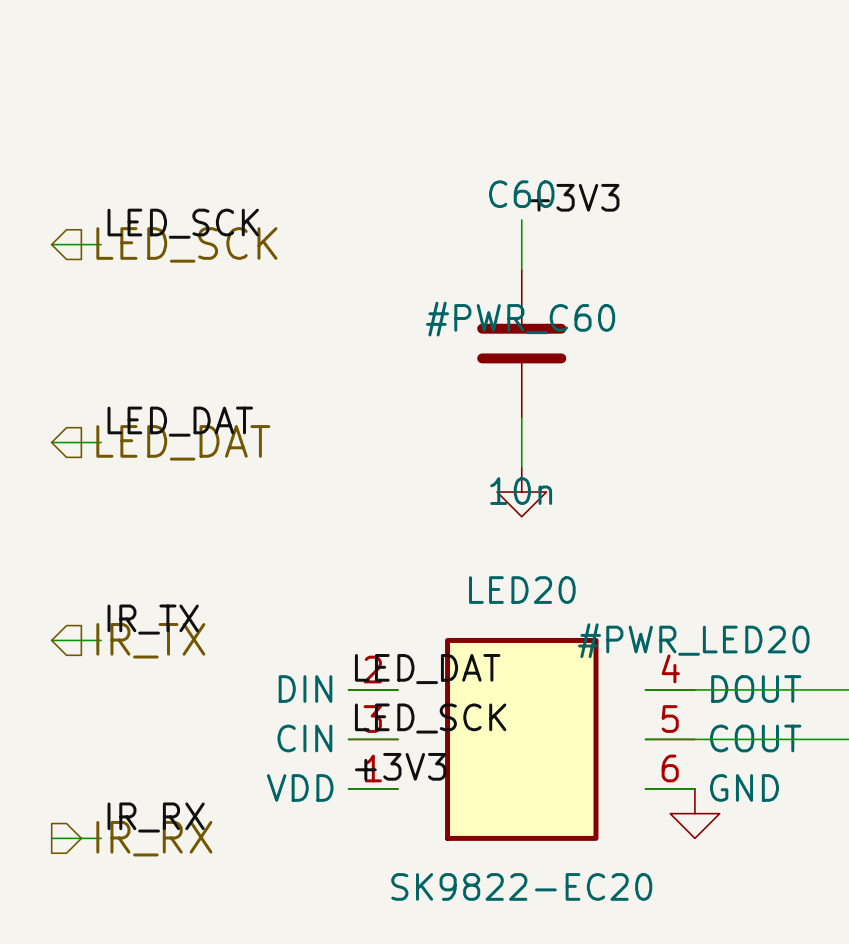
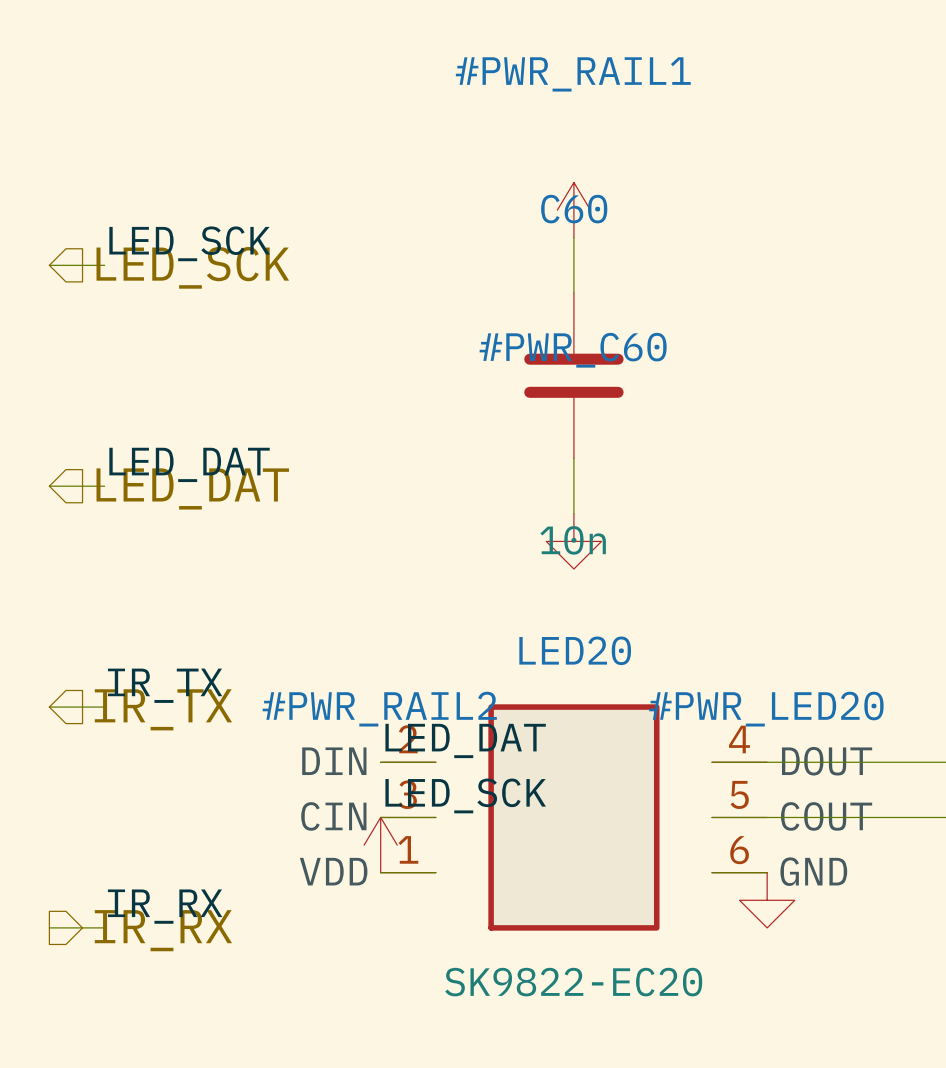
#PWR_RAIL1: none -> (573, 210)
label: +3V3 (573, 197) -> none
#PWR_RAIL2: none -> (380, 845)
label: +3V3 (400, 766) -> none

